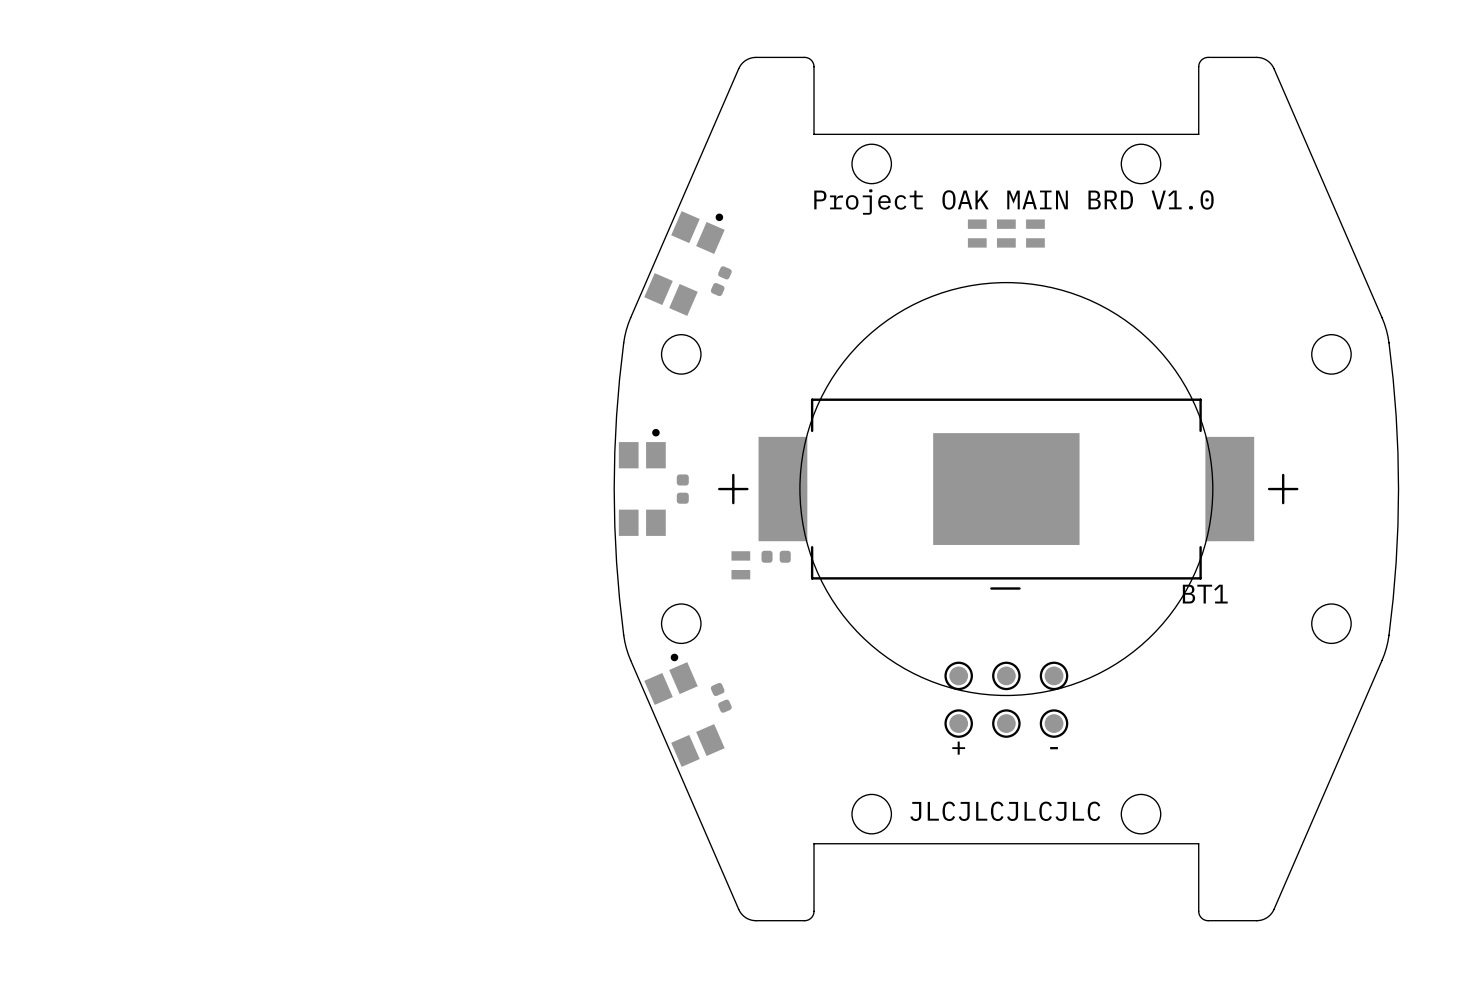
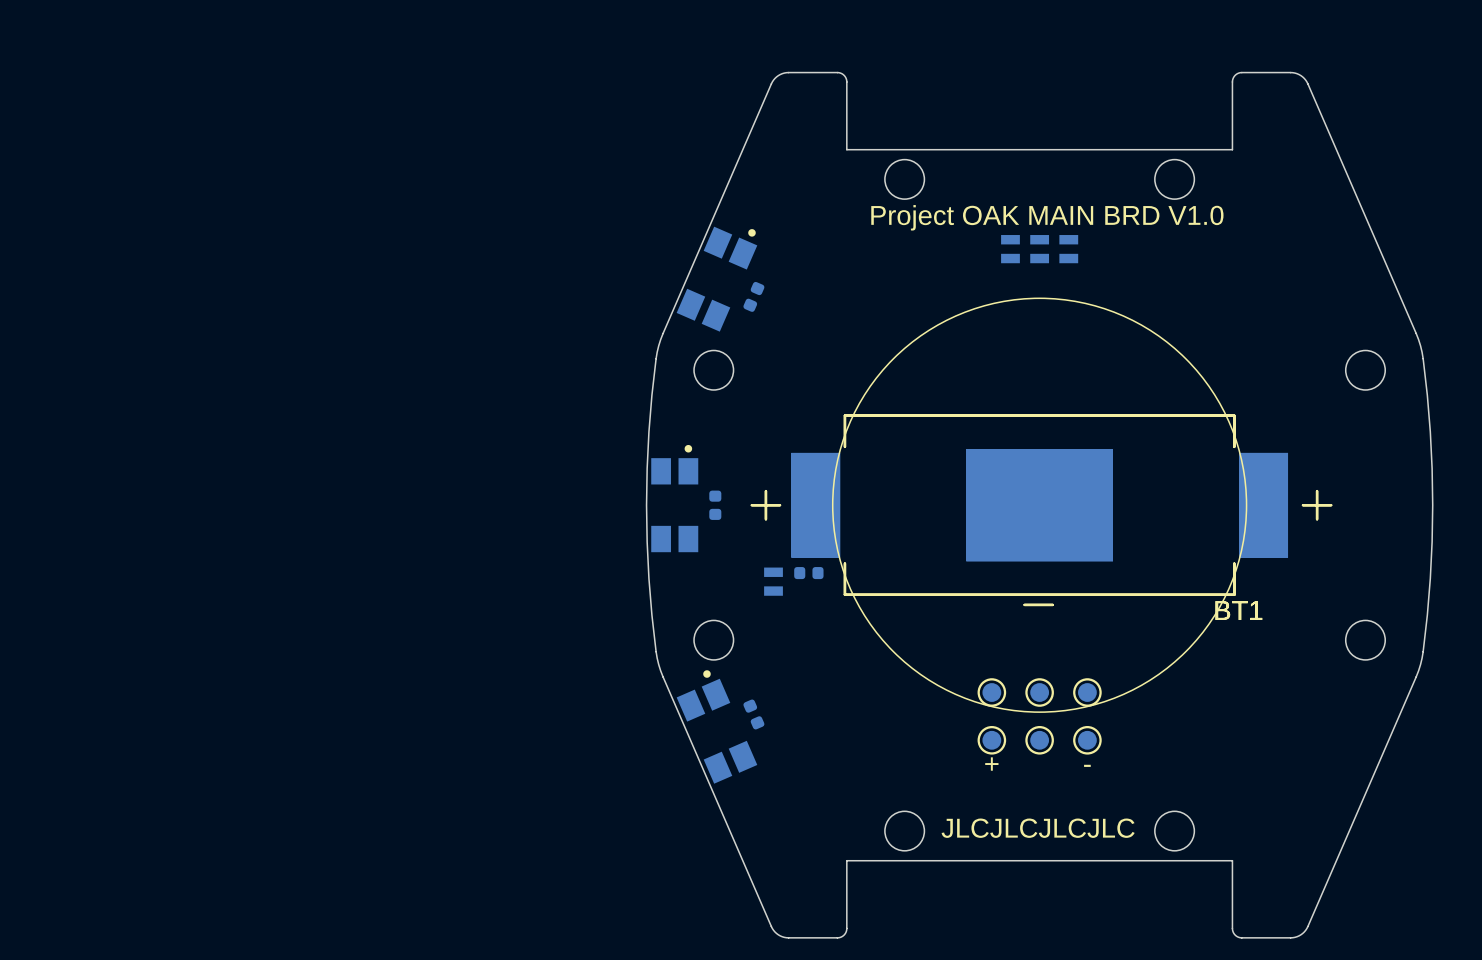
BT1: (1008, 494) -> none
BT1: none -> (1041, 510)
BT1: none -> (1041, 510)

